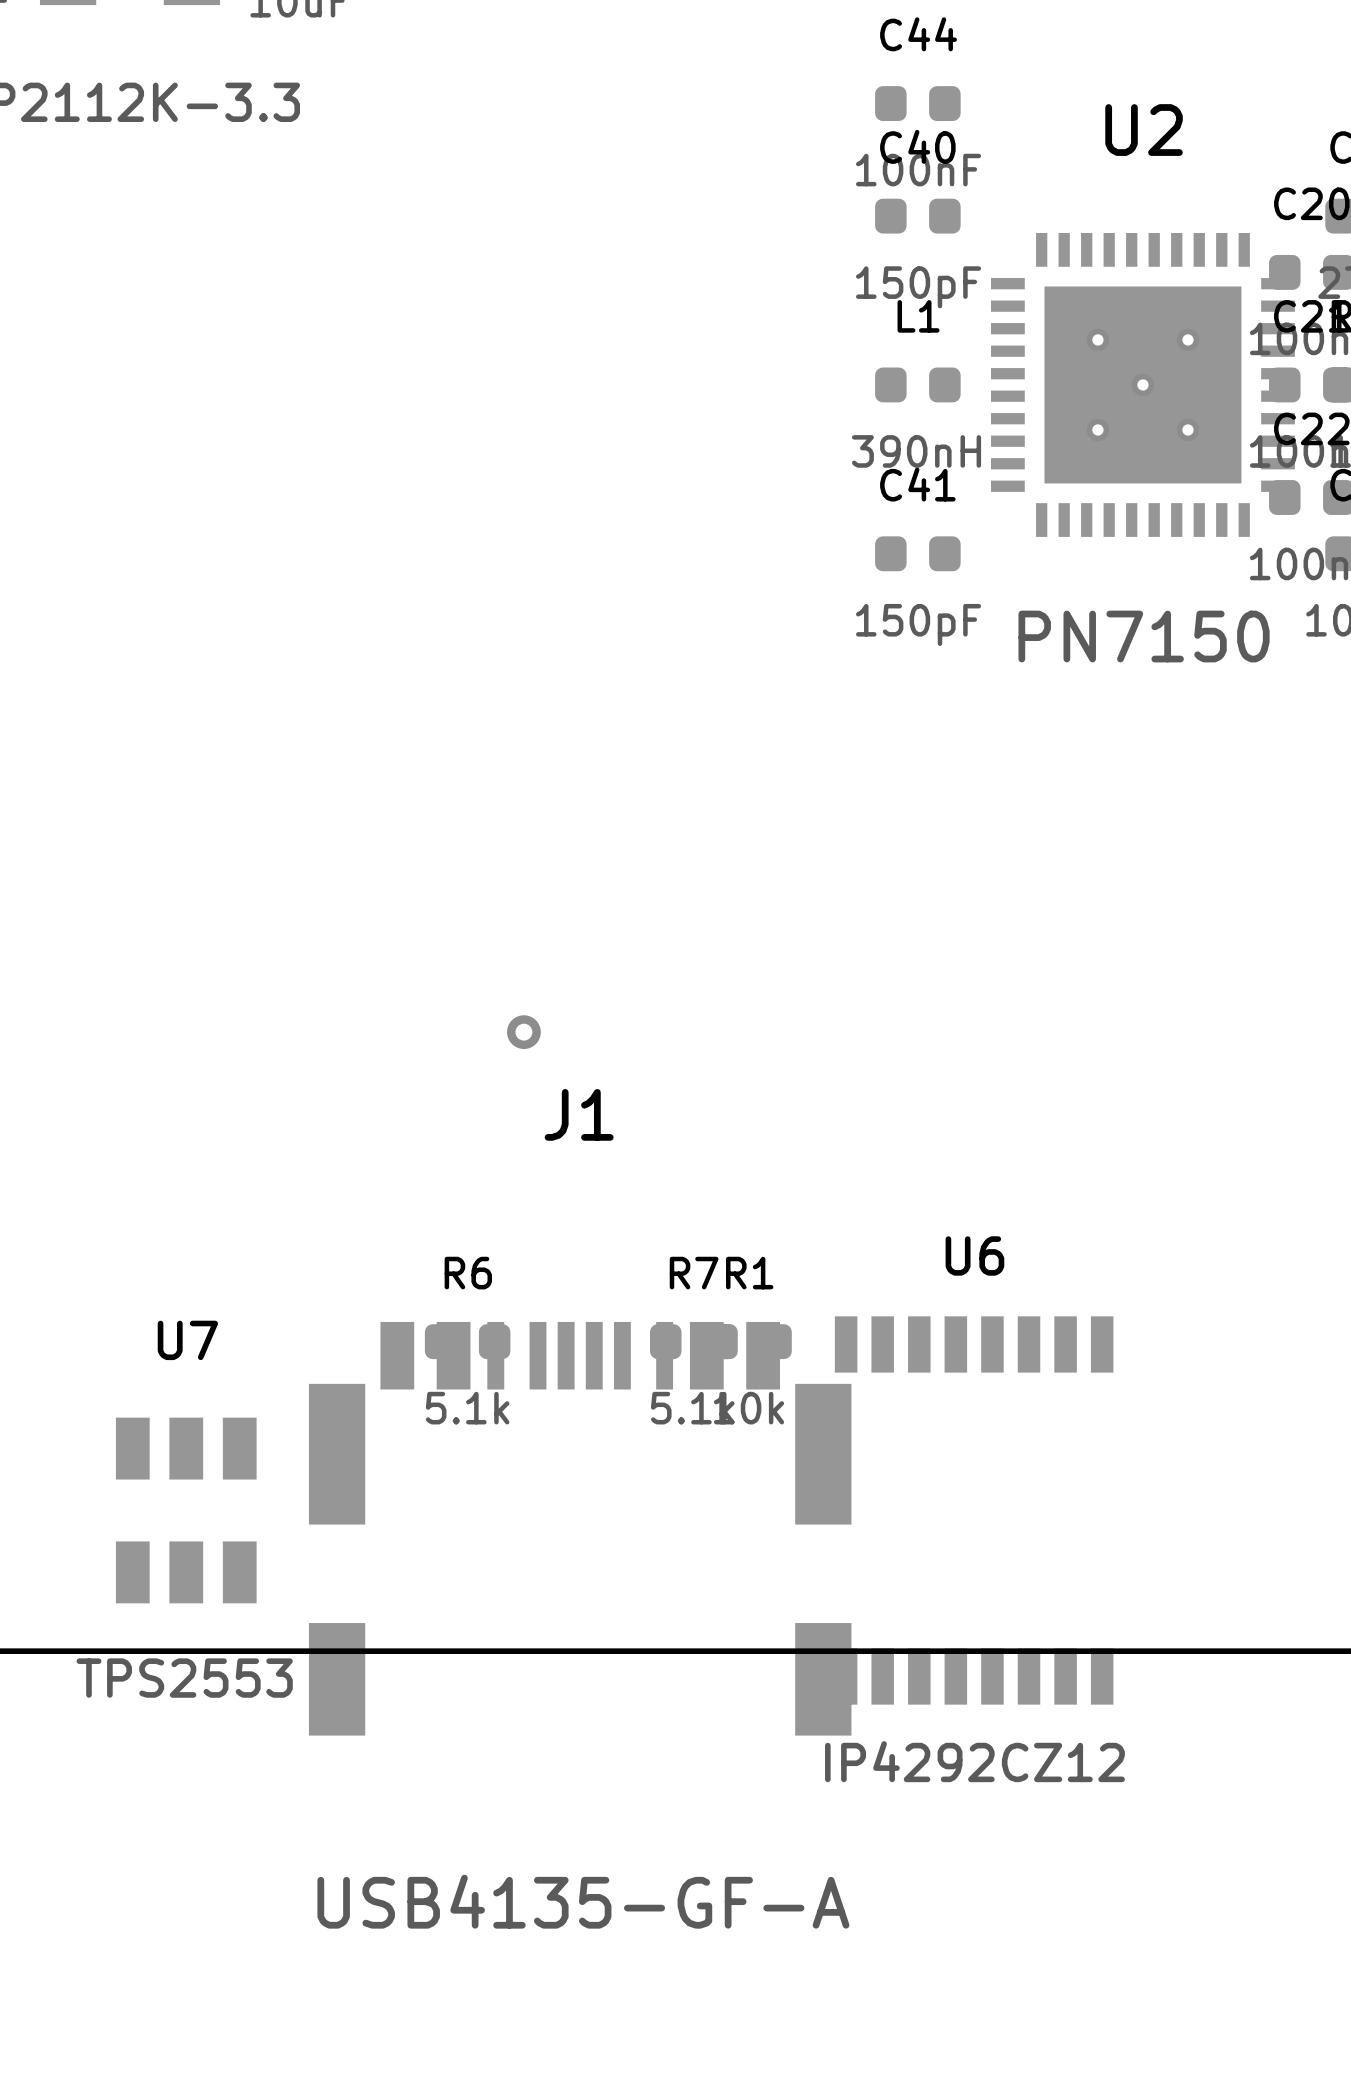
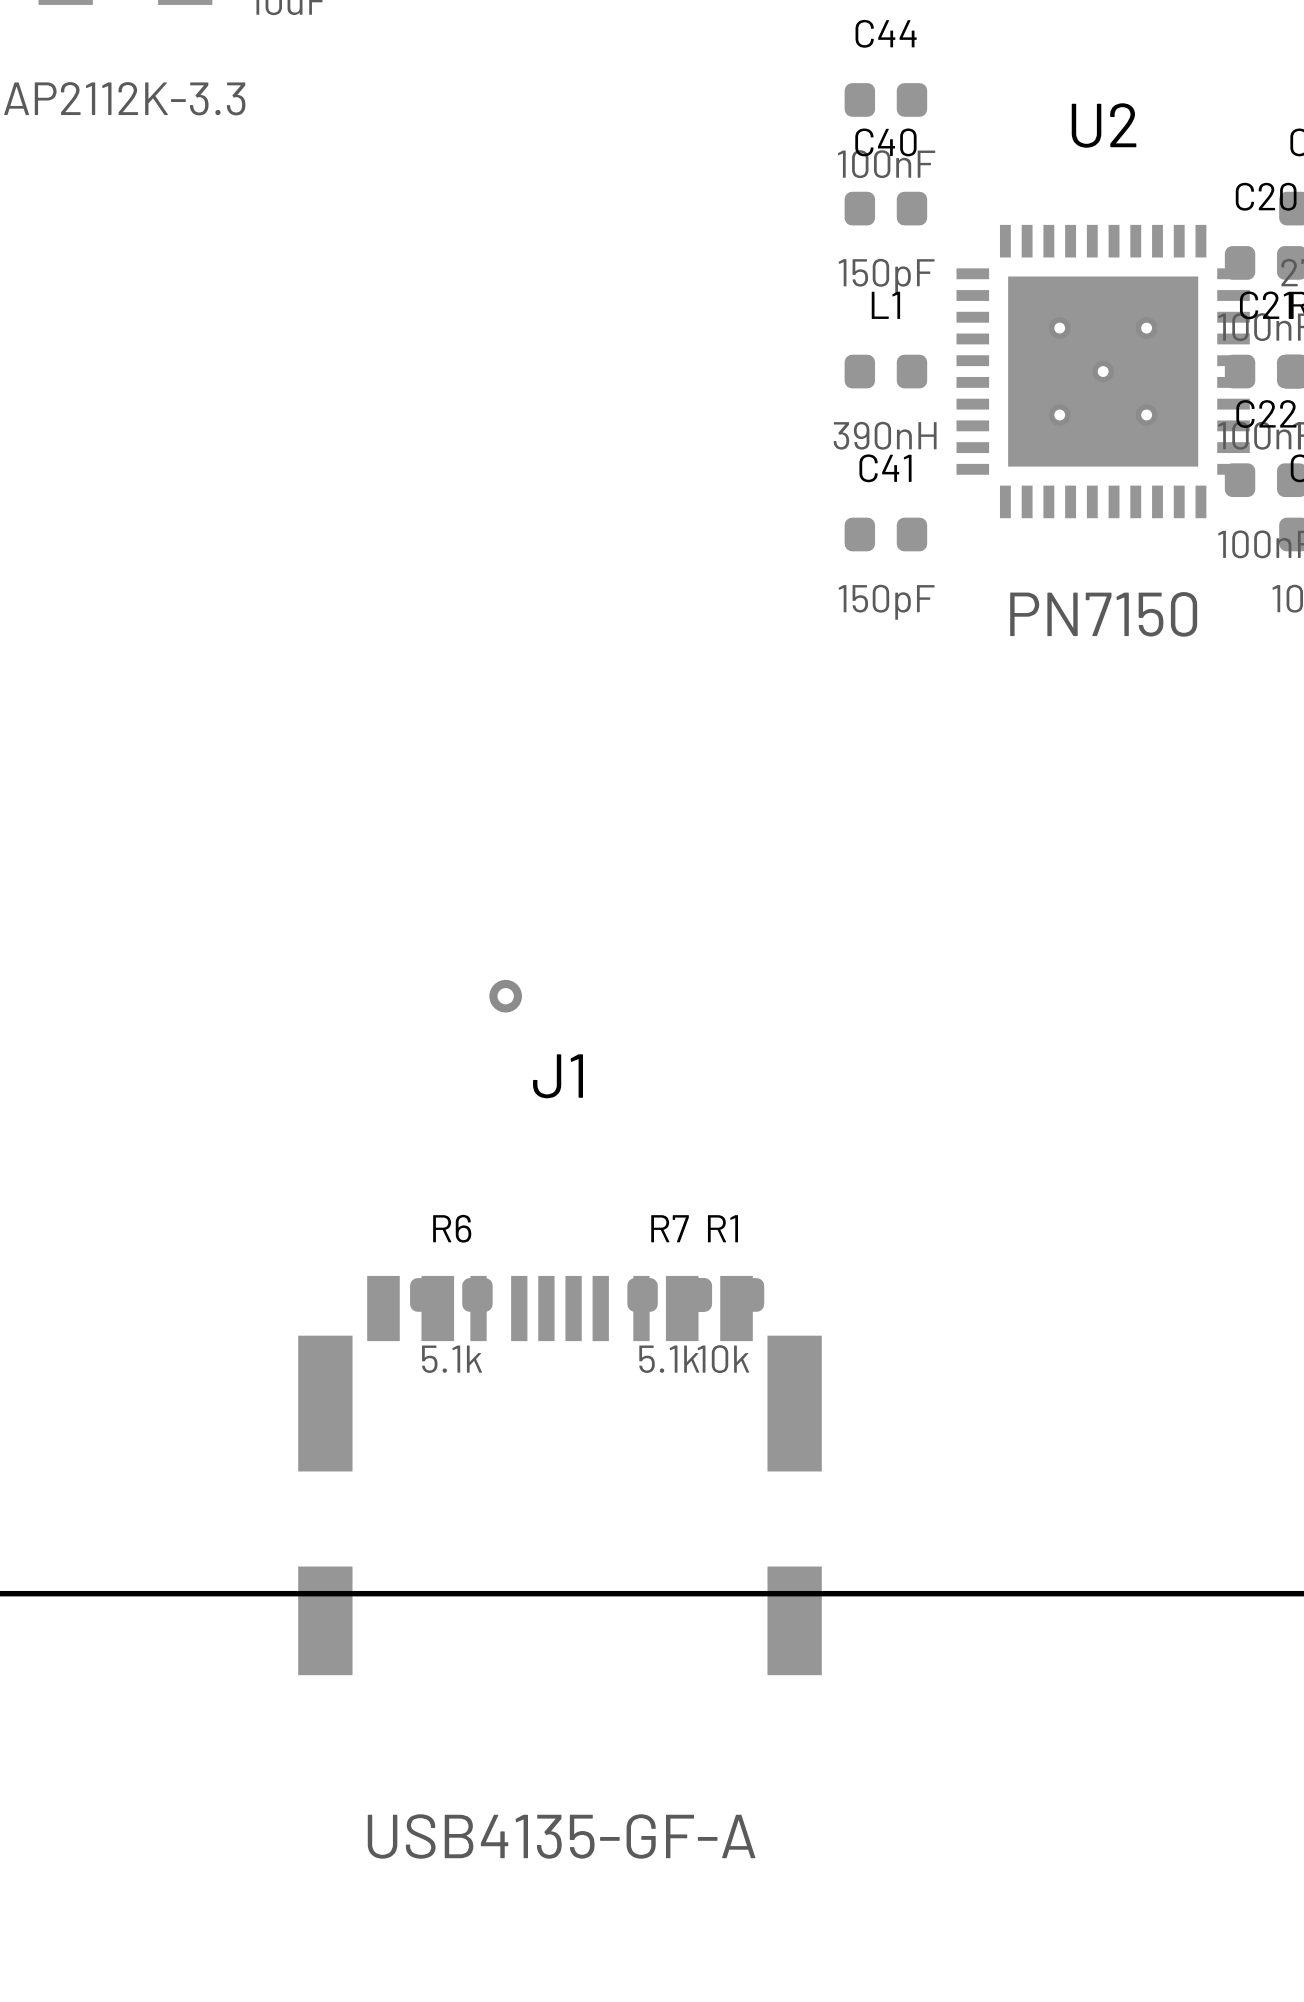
U7: TPS2553 (186, 1510) -> none
U6: IP4292CZ12 (974, 1510) -> none

